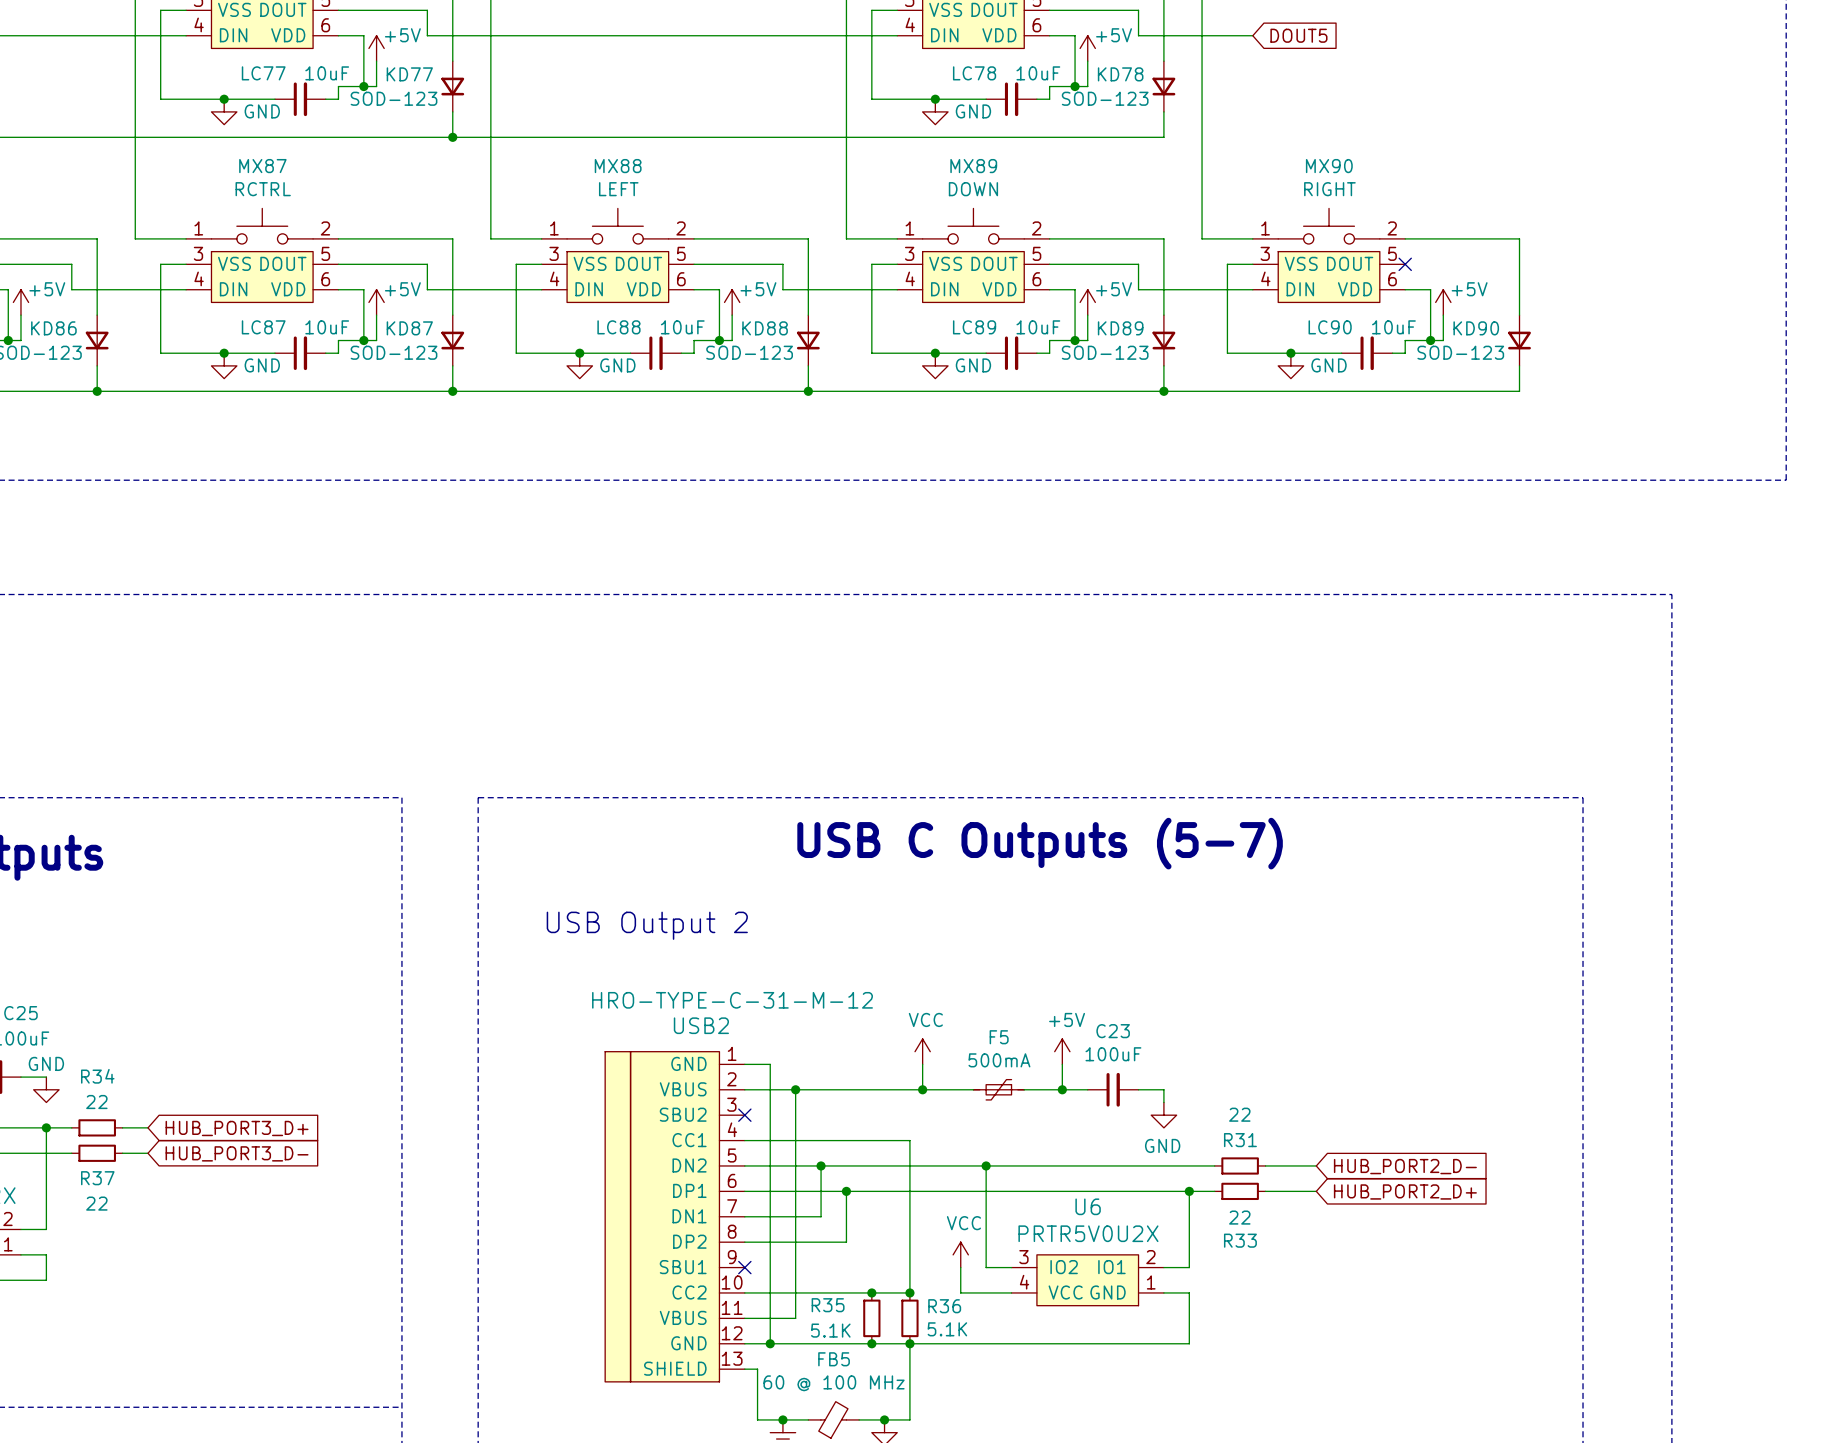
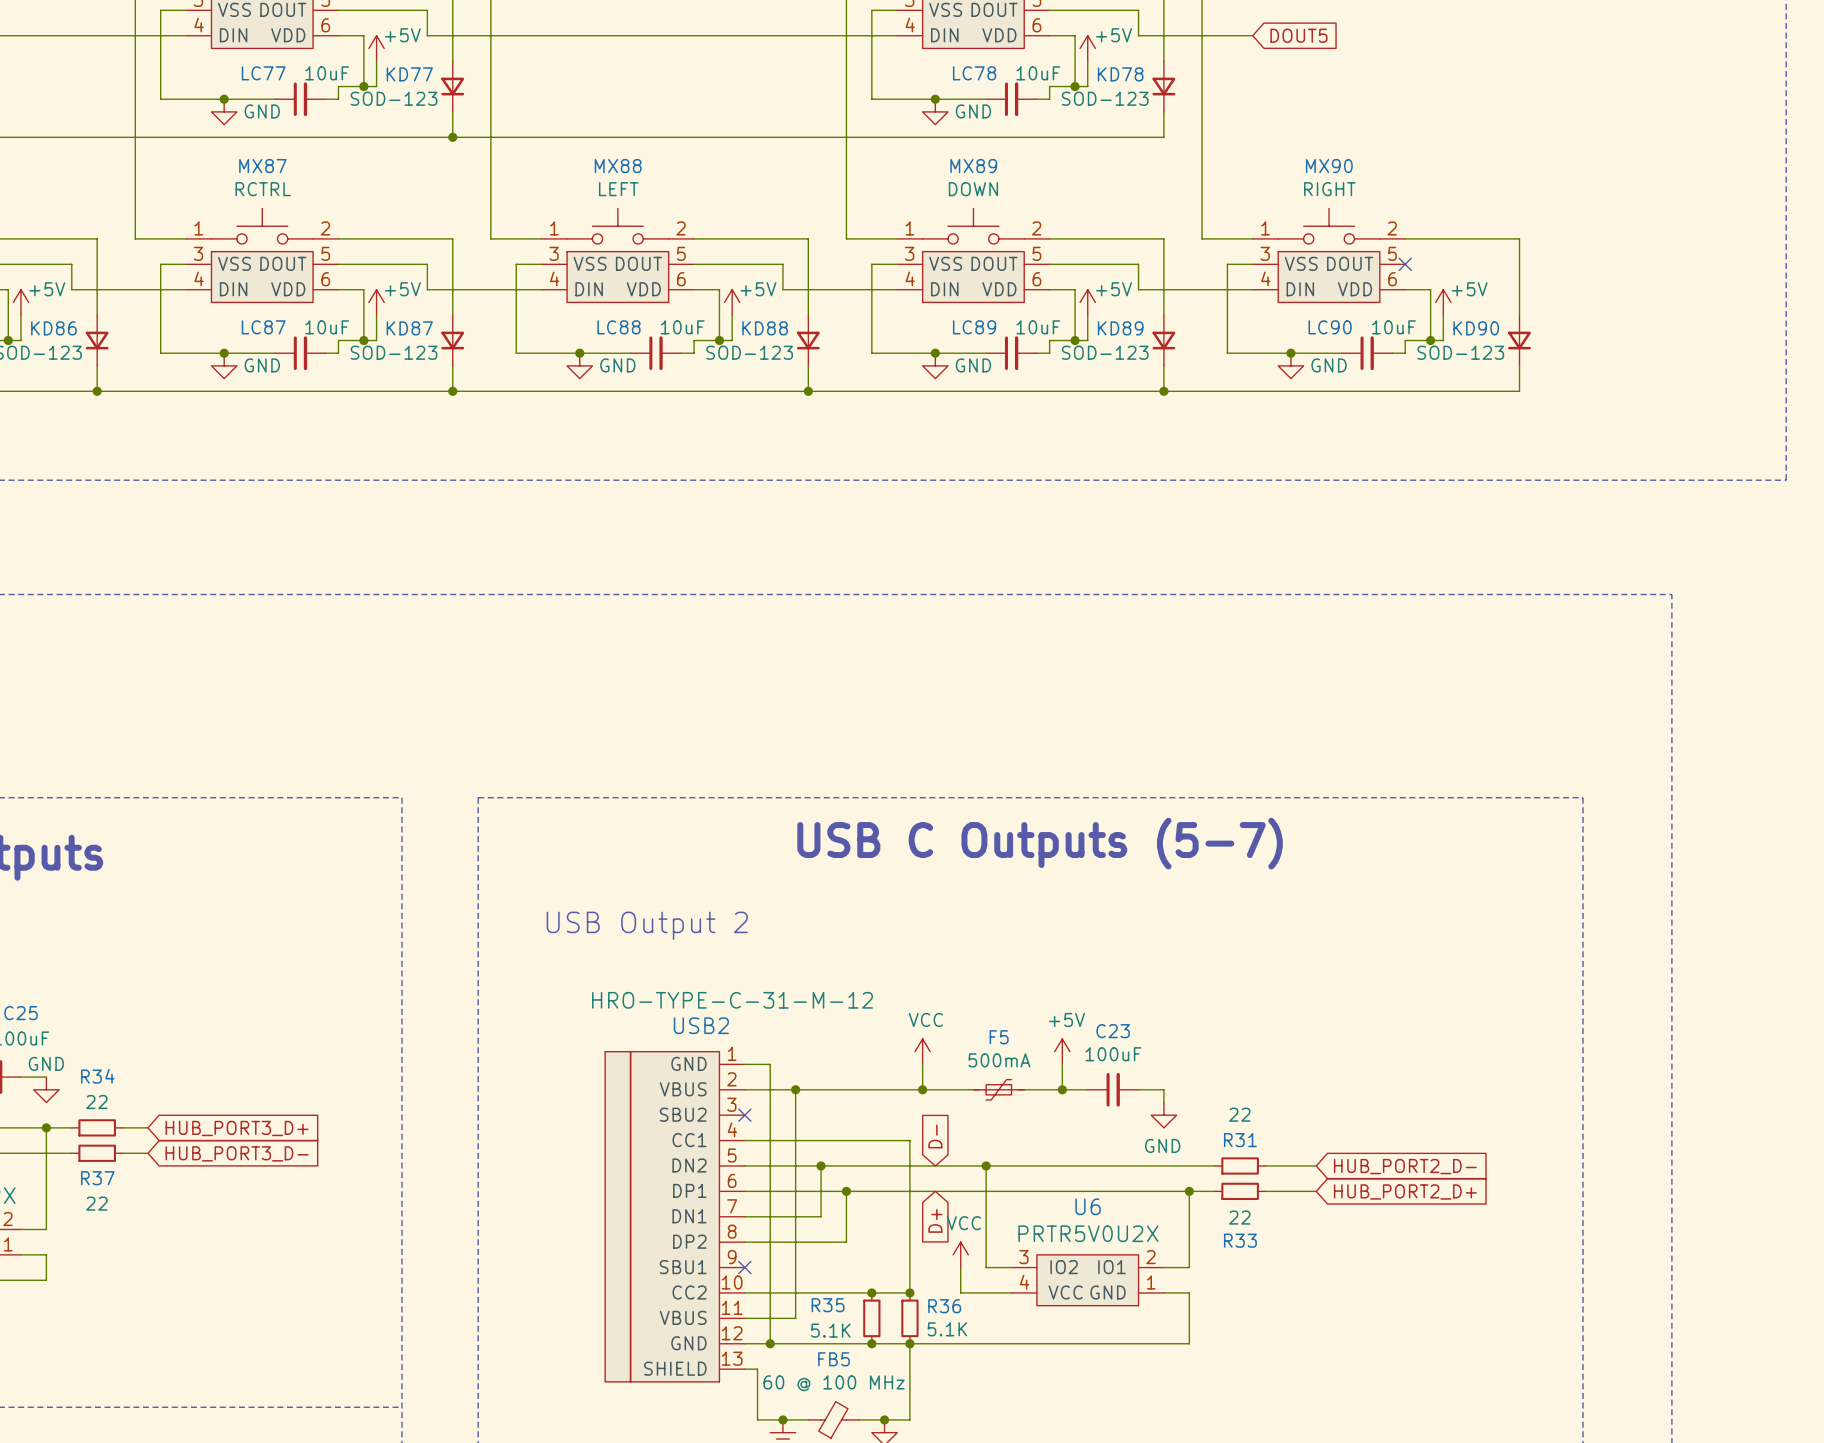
global label: none -> D- (935, 1136)
global label: none -> D+ (935, 1220)

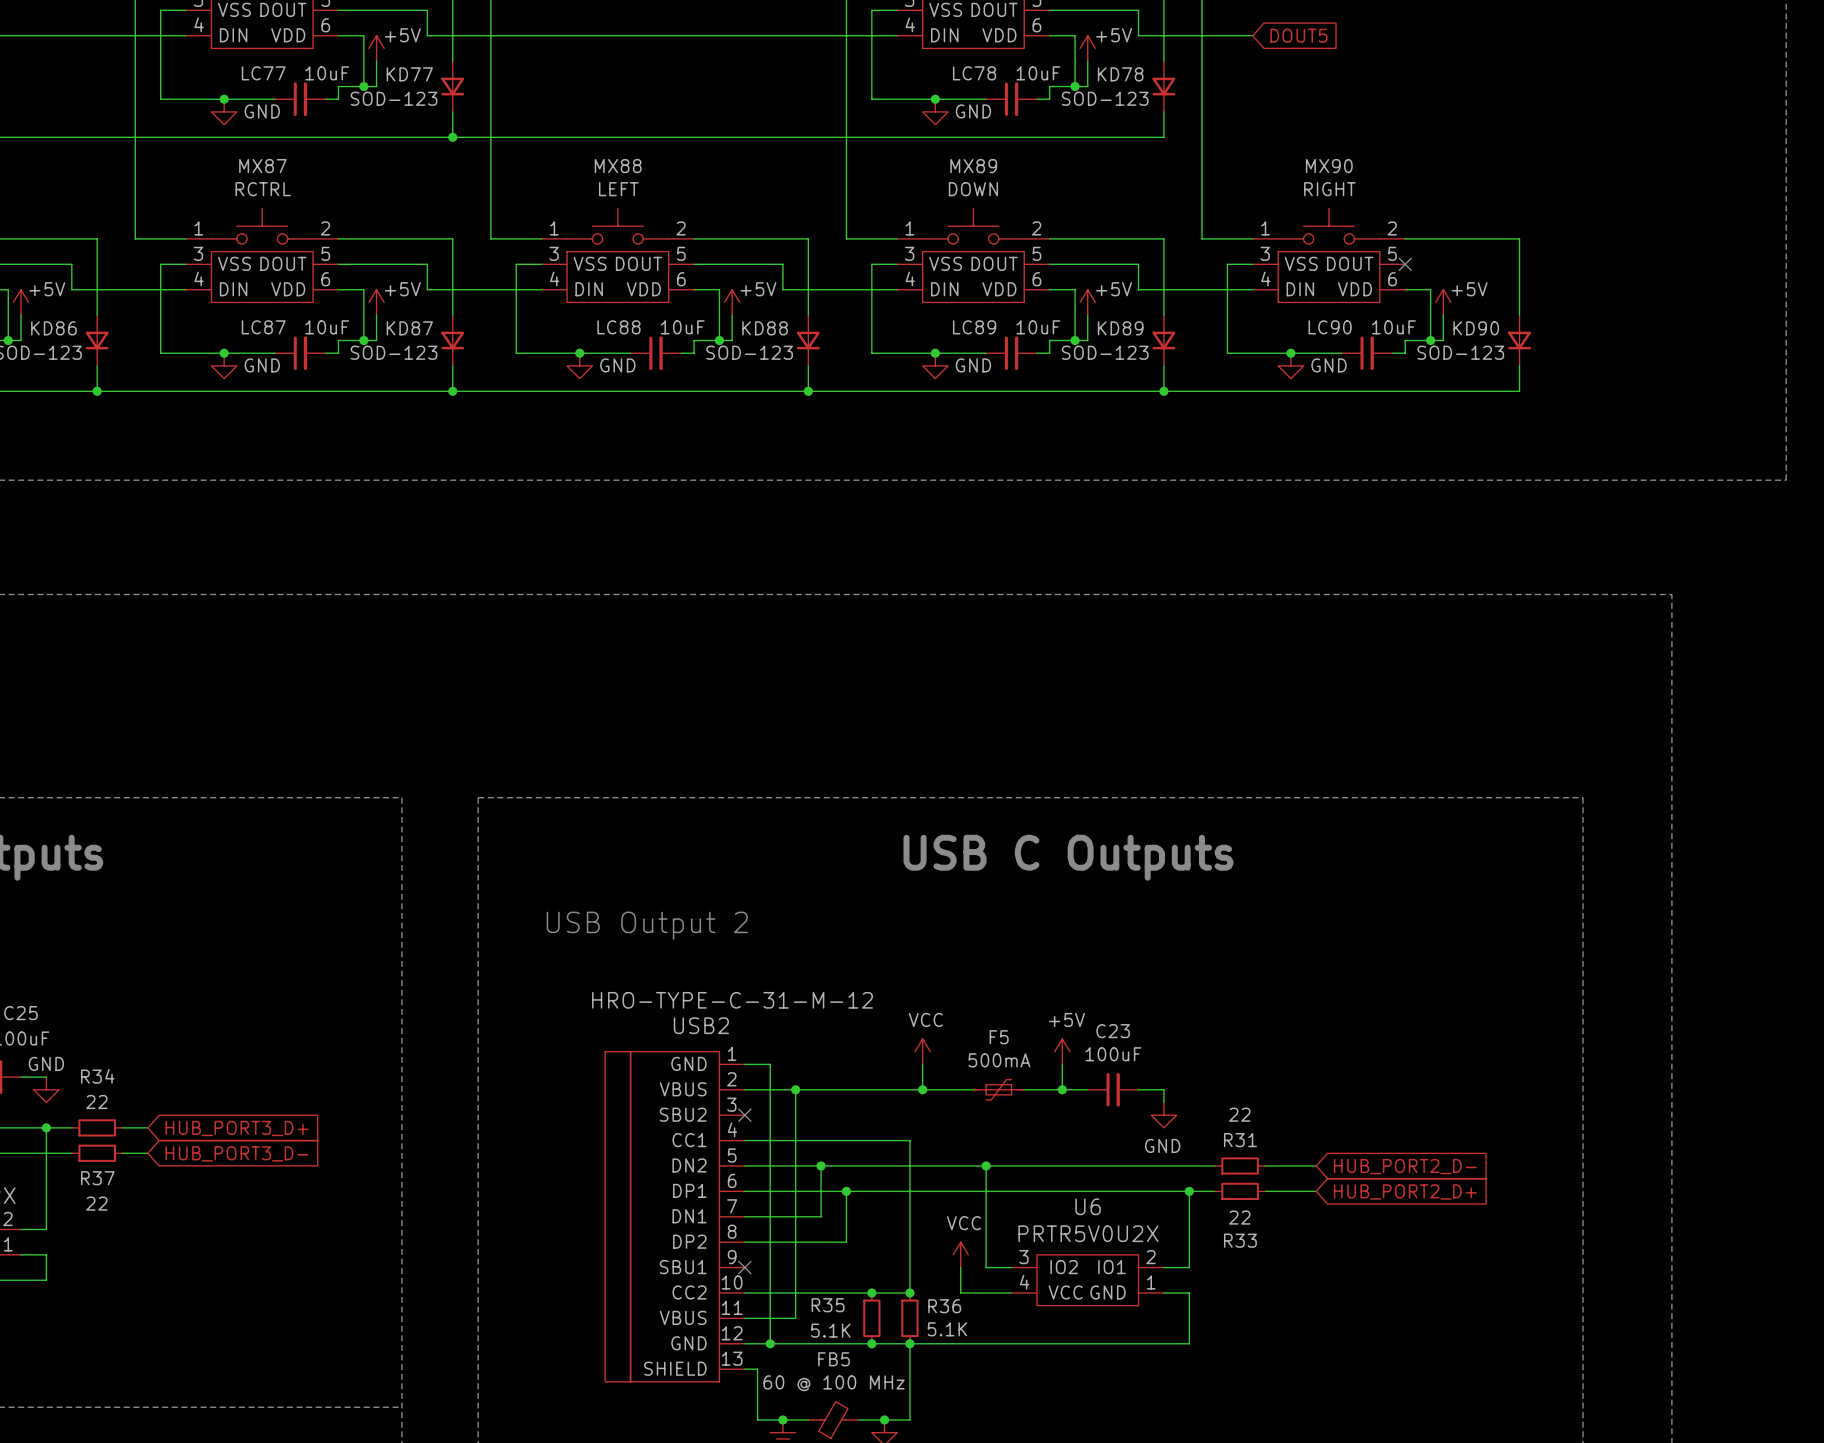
text: USB C Outputs (5-7) (1040, 843) -> USB C Outputs (1068, 857)
global label: D- (935, 1136) -> none
global label: D+ (935, 1220) -> none

